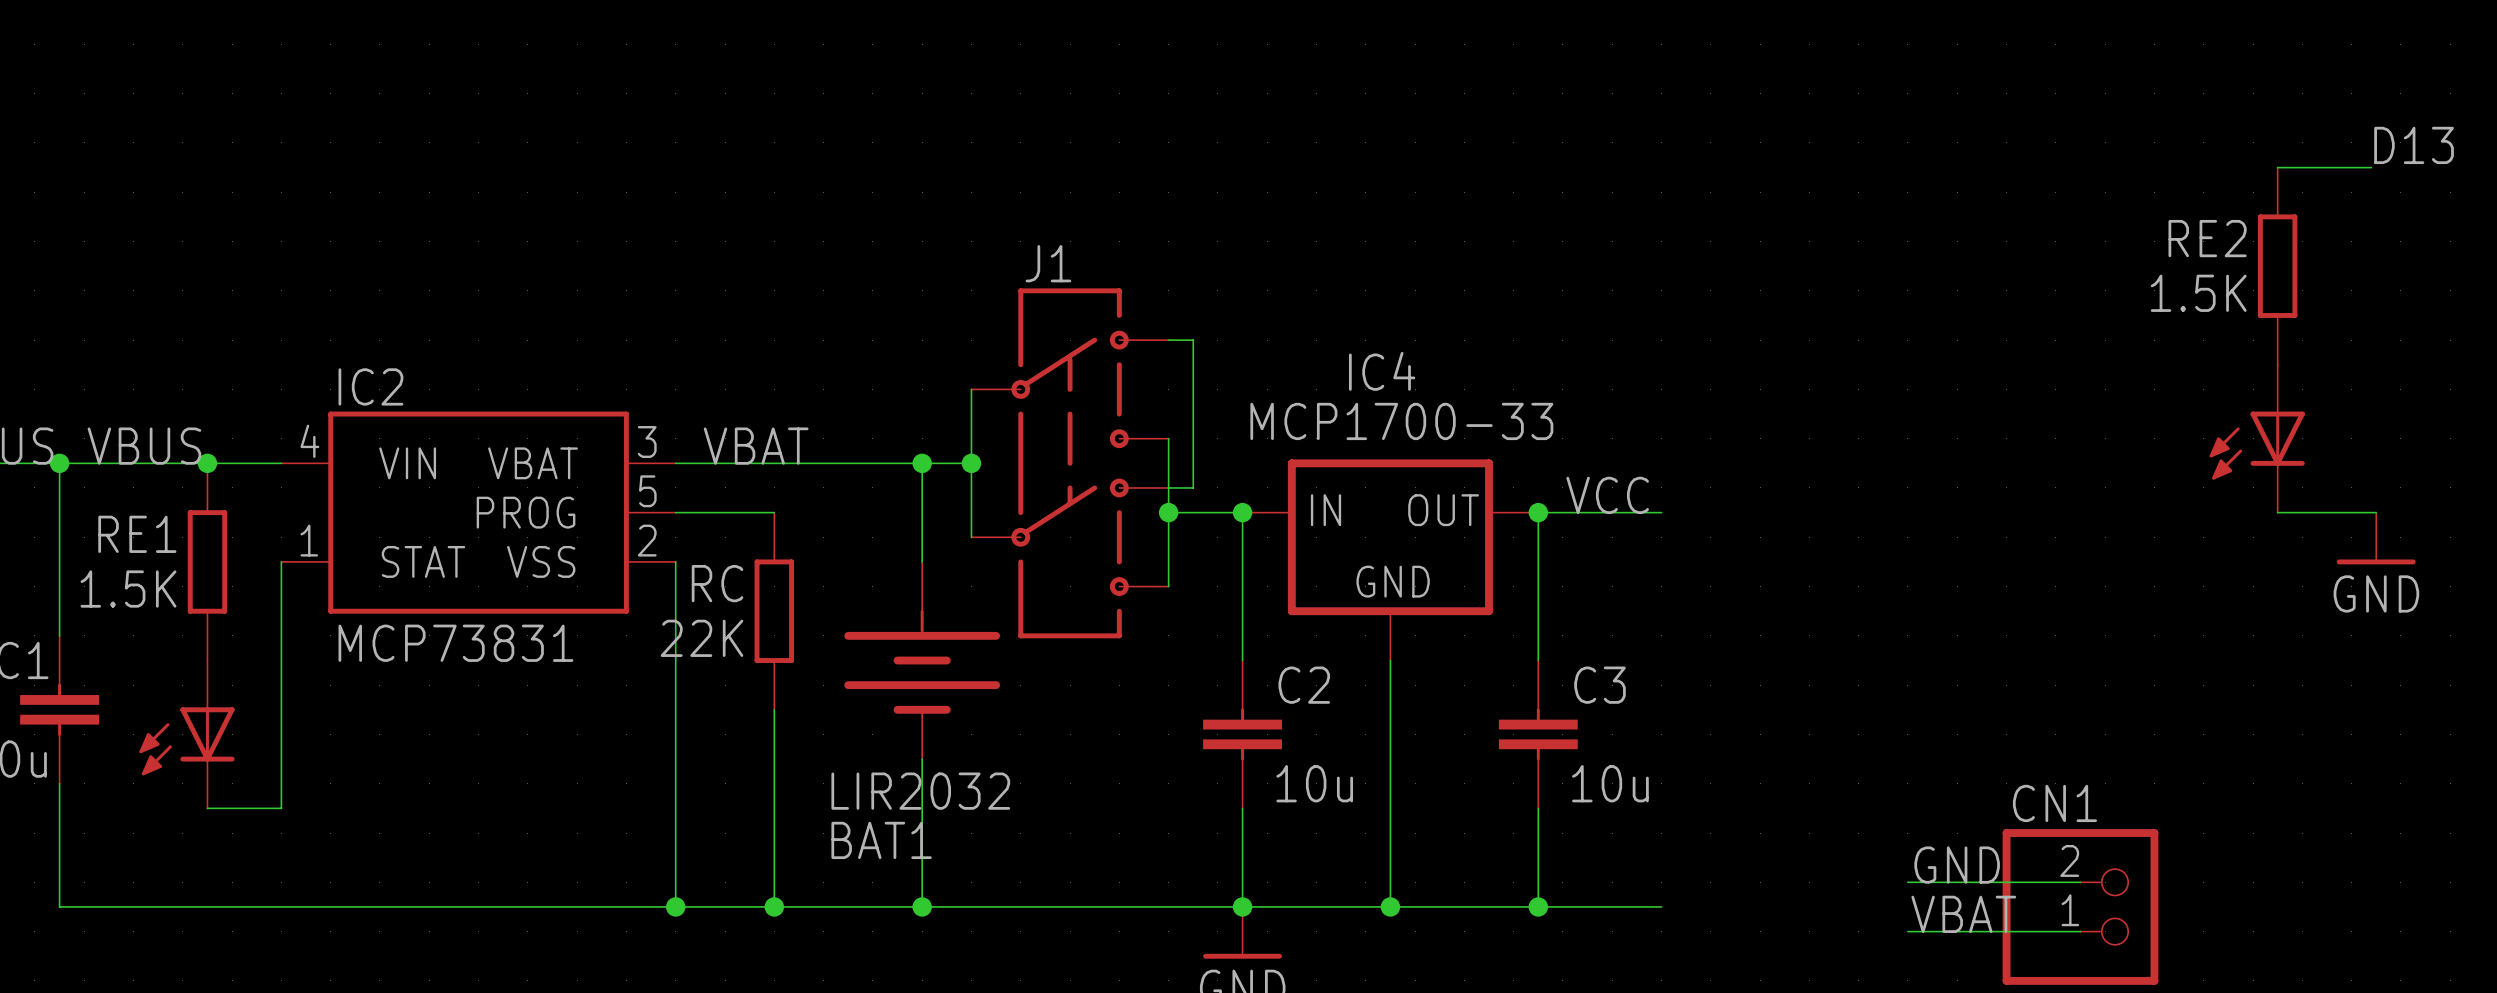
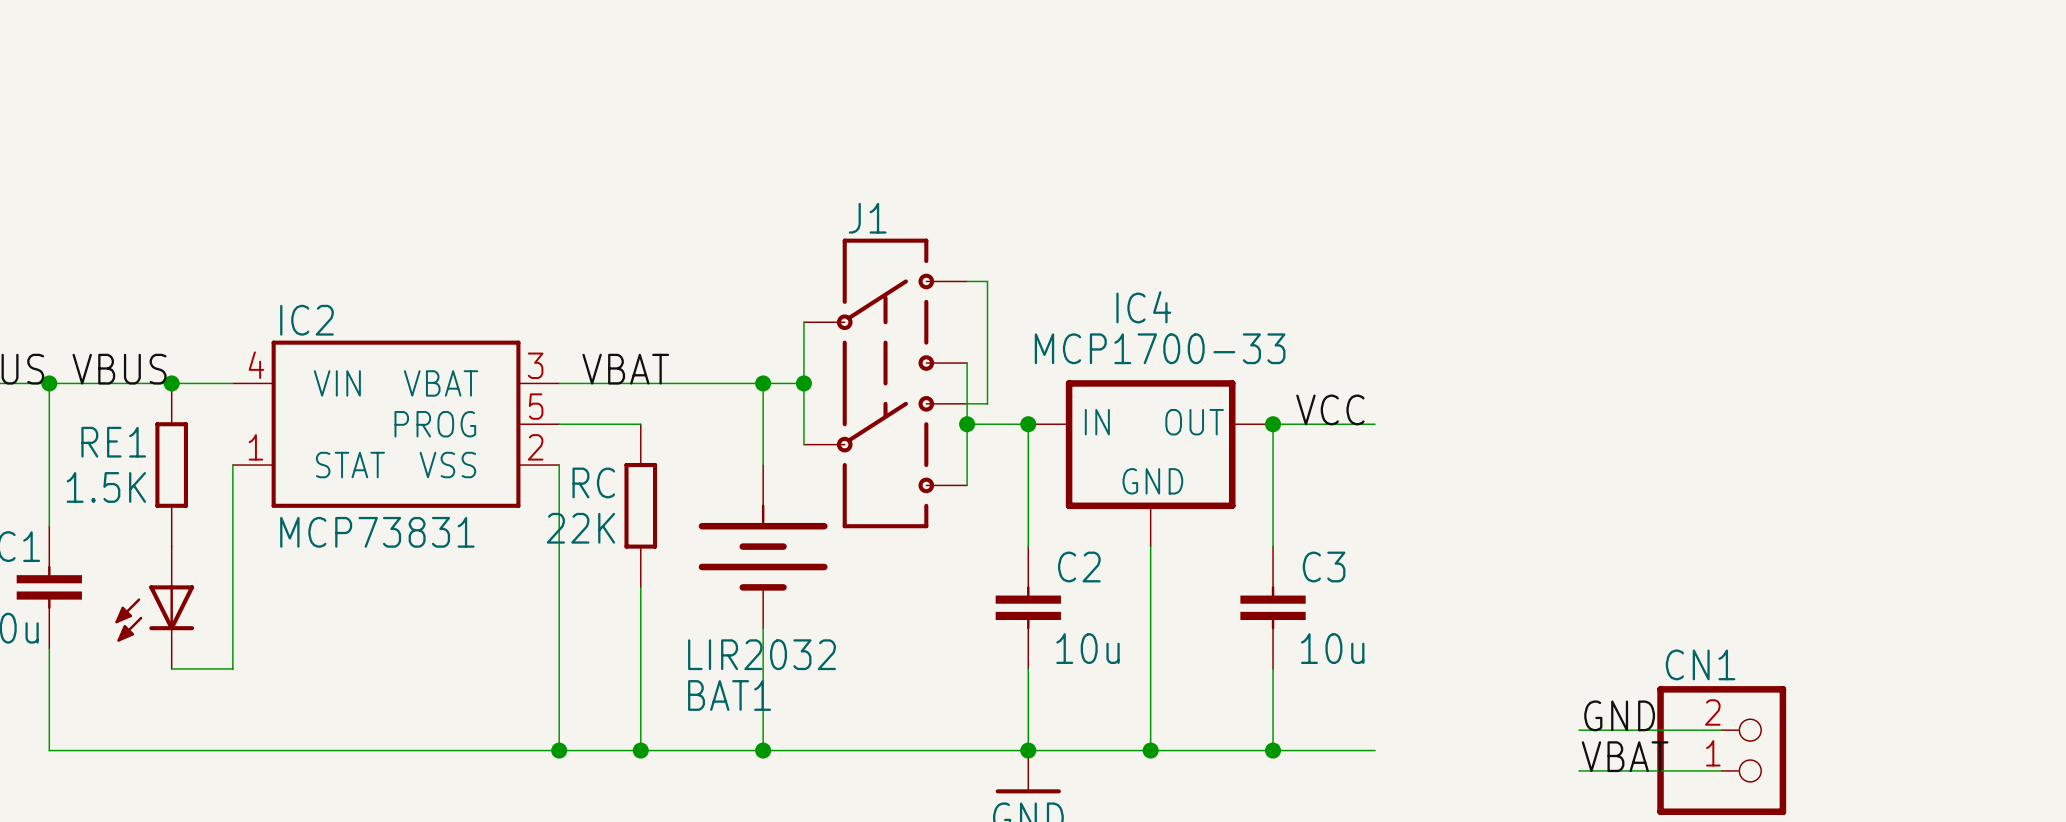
label: D13 (2414, 145) -> none
wire: (2277, 167) (2371, 167) -> none
RE2: 1.5K (2277, 266) -> none
part: (2257, 438) -> none
wire: (2277, 512) (2376, 512) -> none
power symbol: GND (2376, 538) -> none

